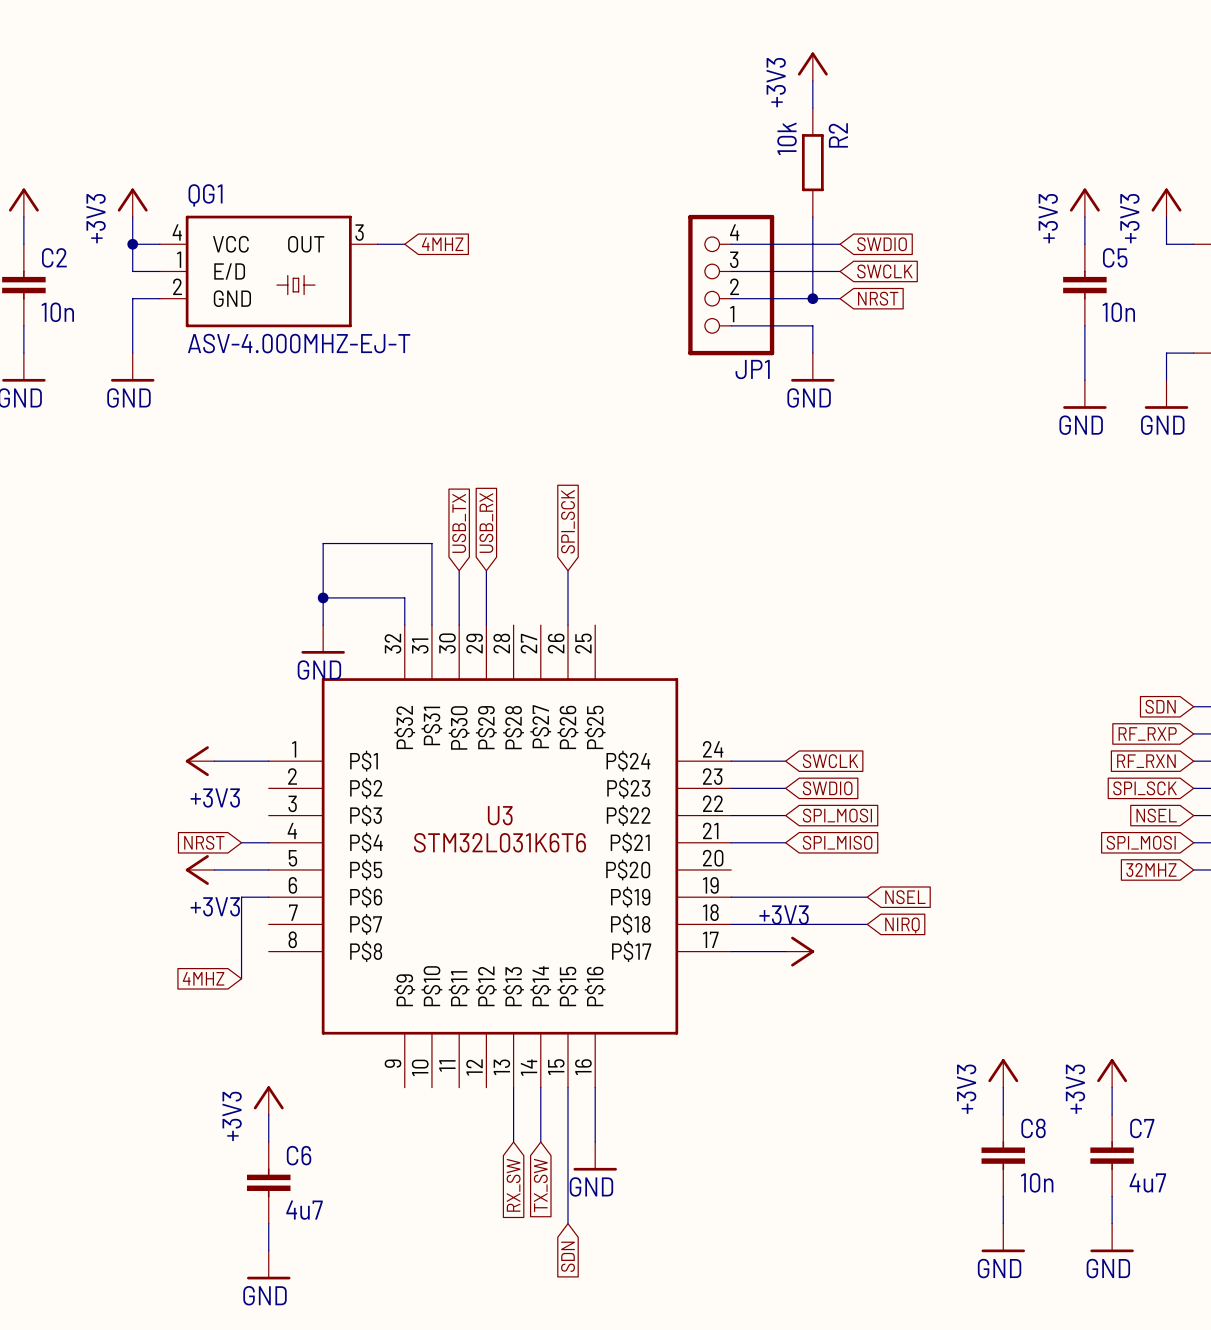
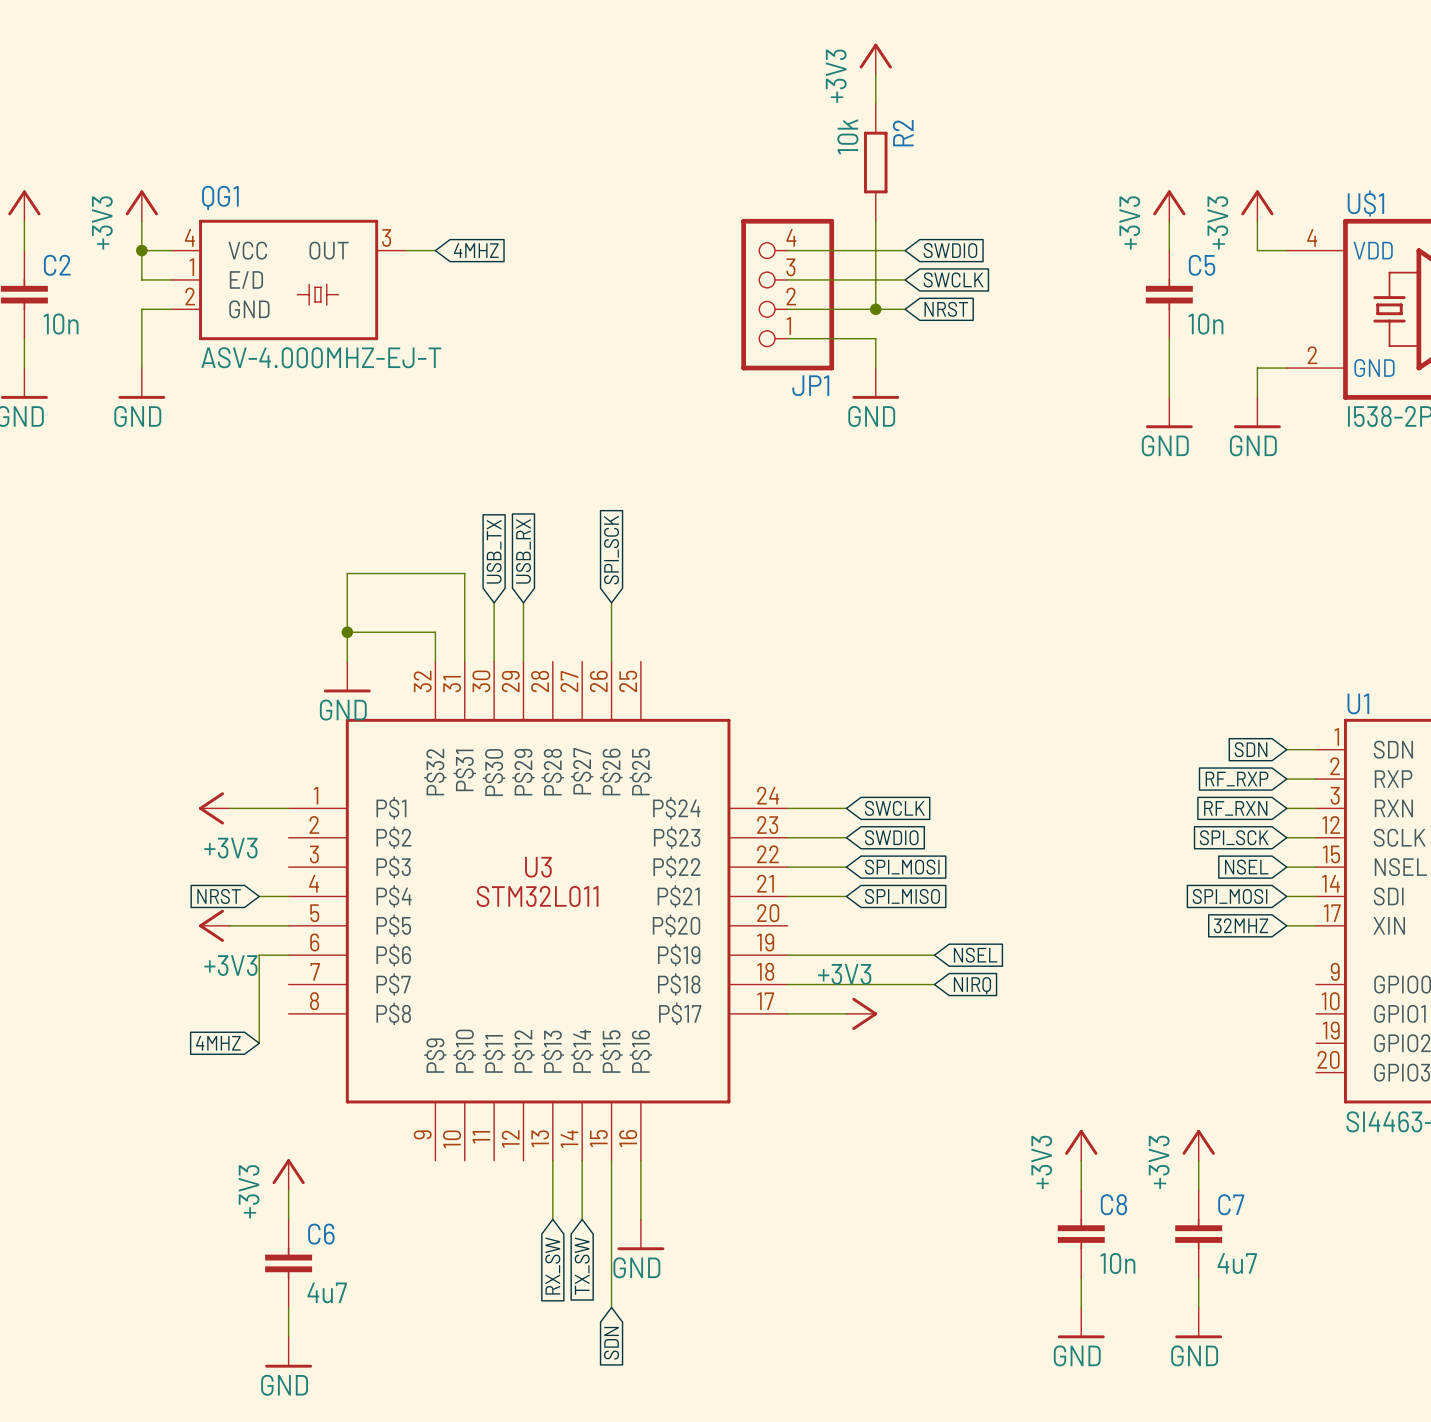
U3 value: STM32L031K6T6 (500, 842) -> STM32L011 (537, 896)

